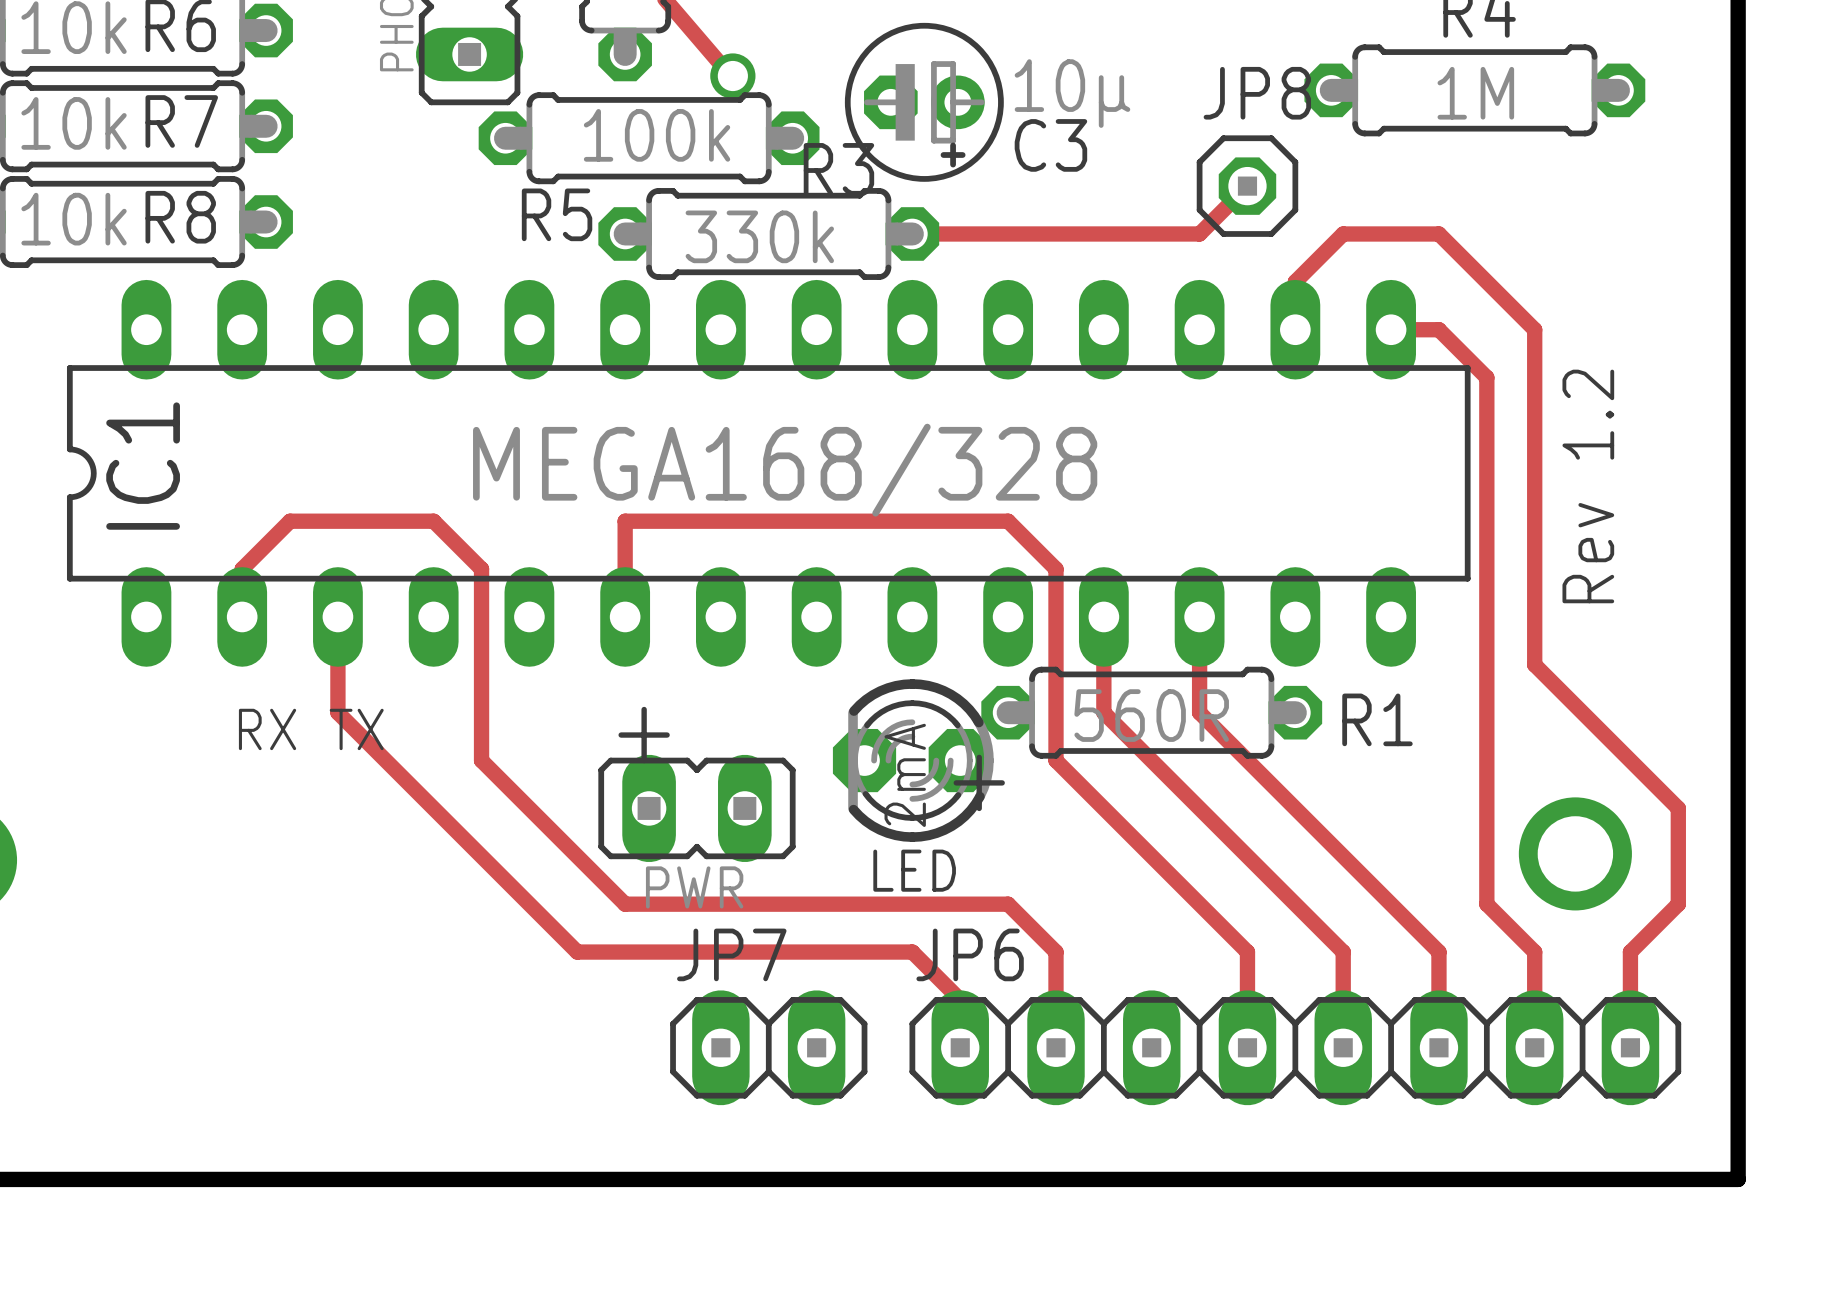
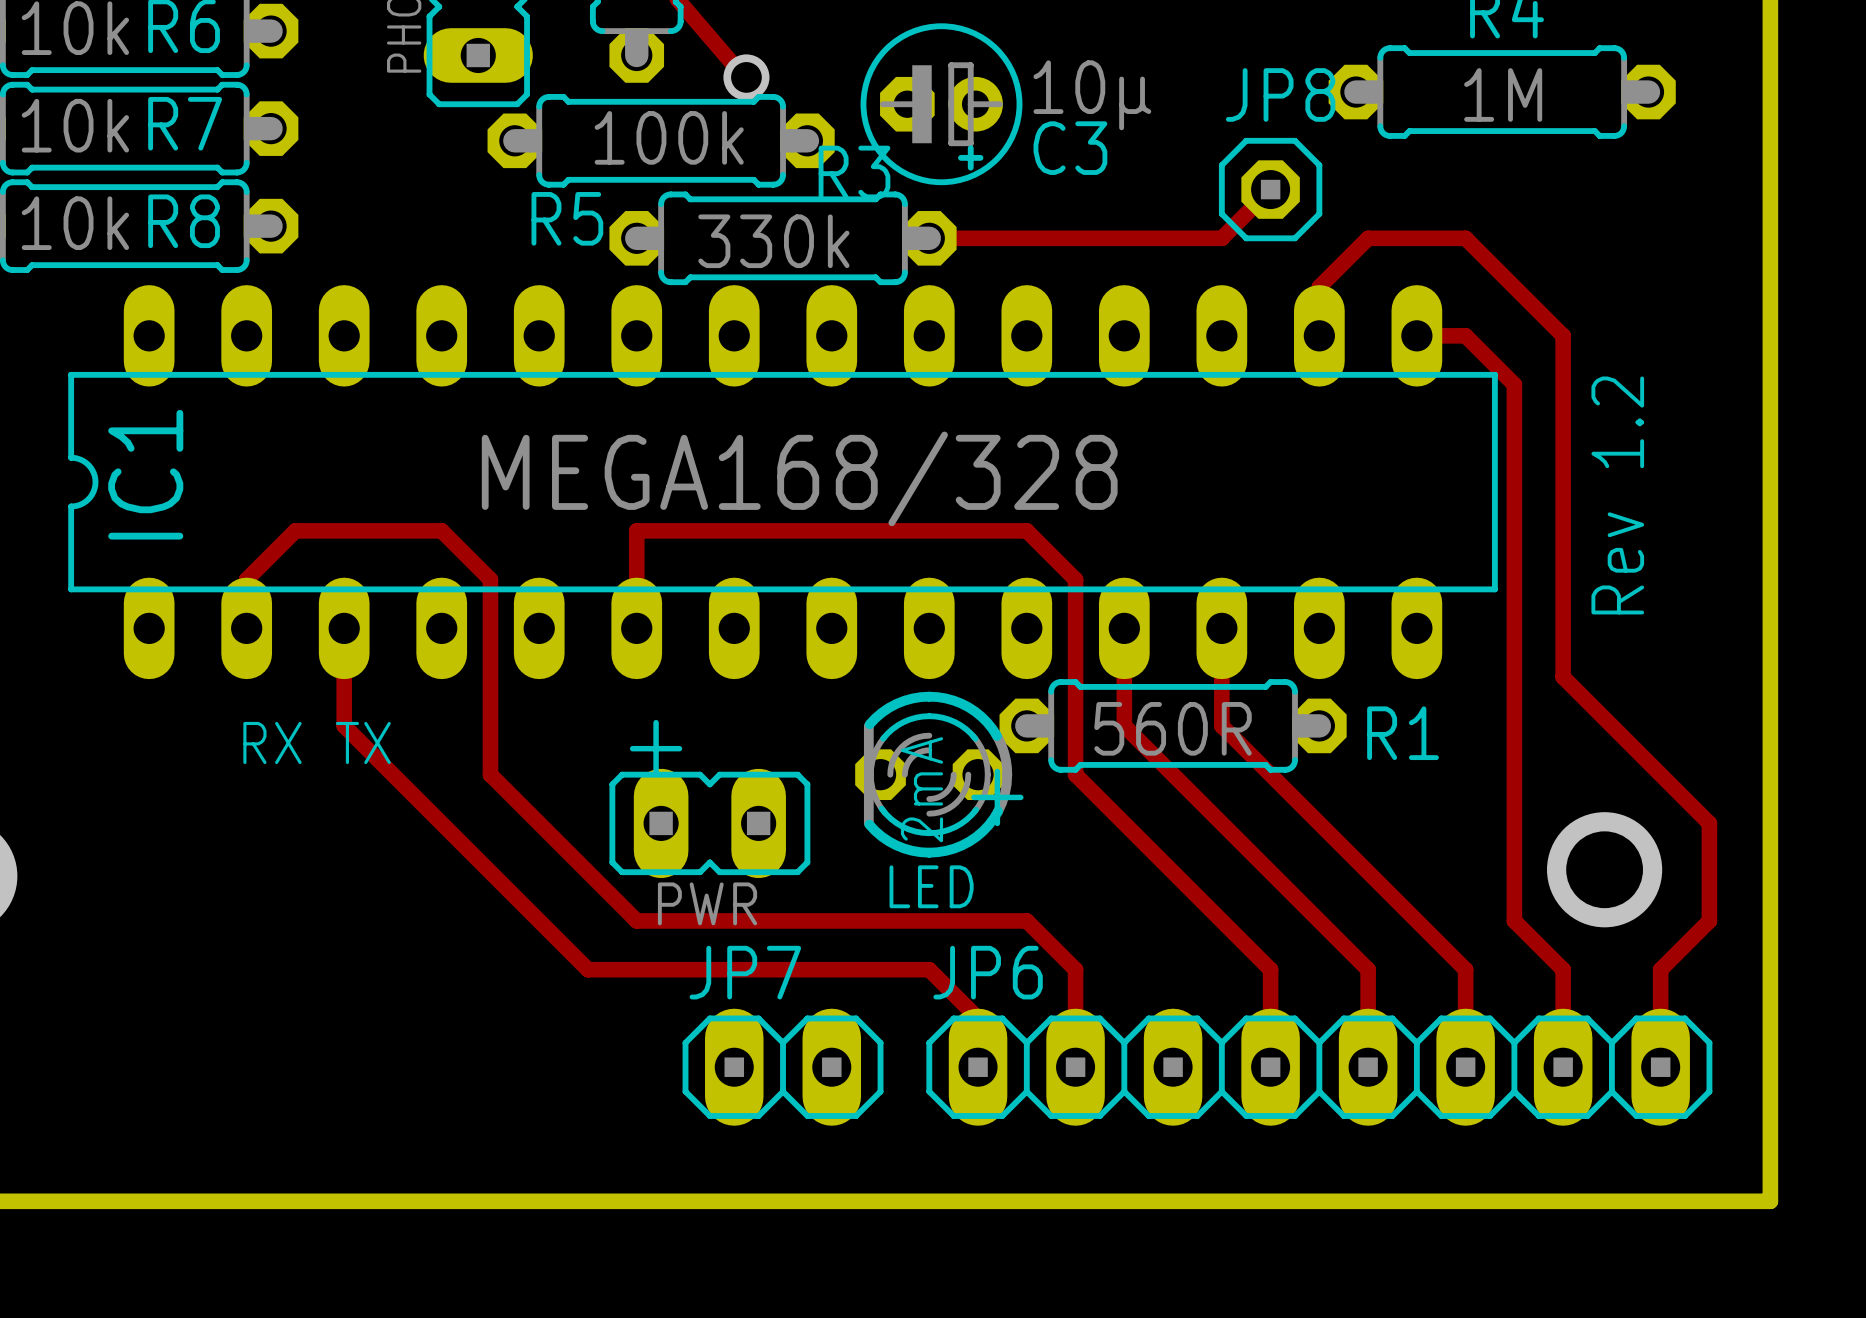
LED footprint: [832, 679, 994, 842] -> [855, 691, 1013, 858]

